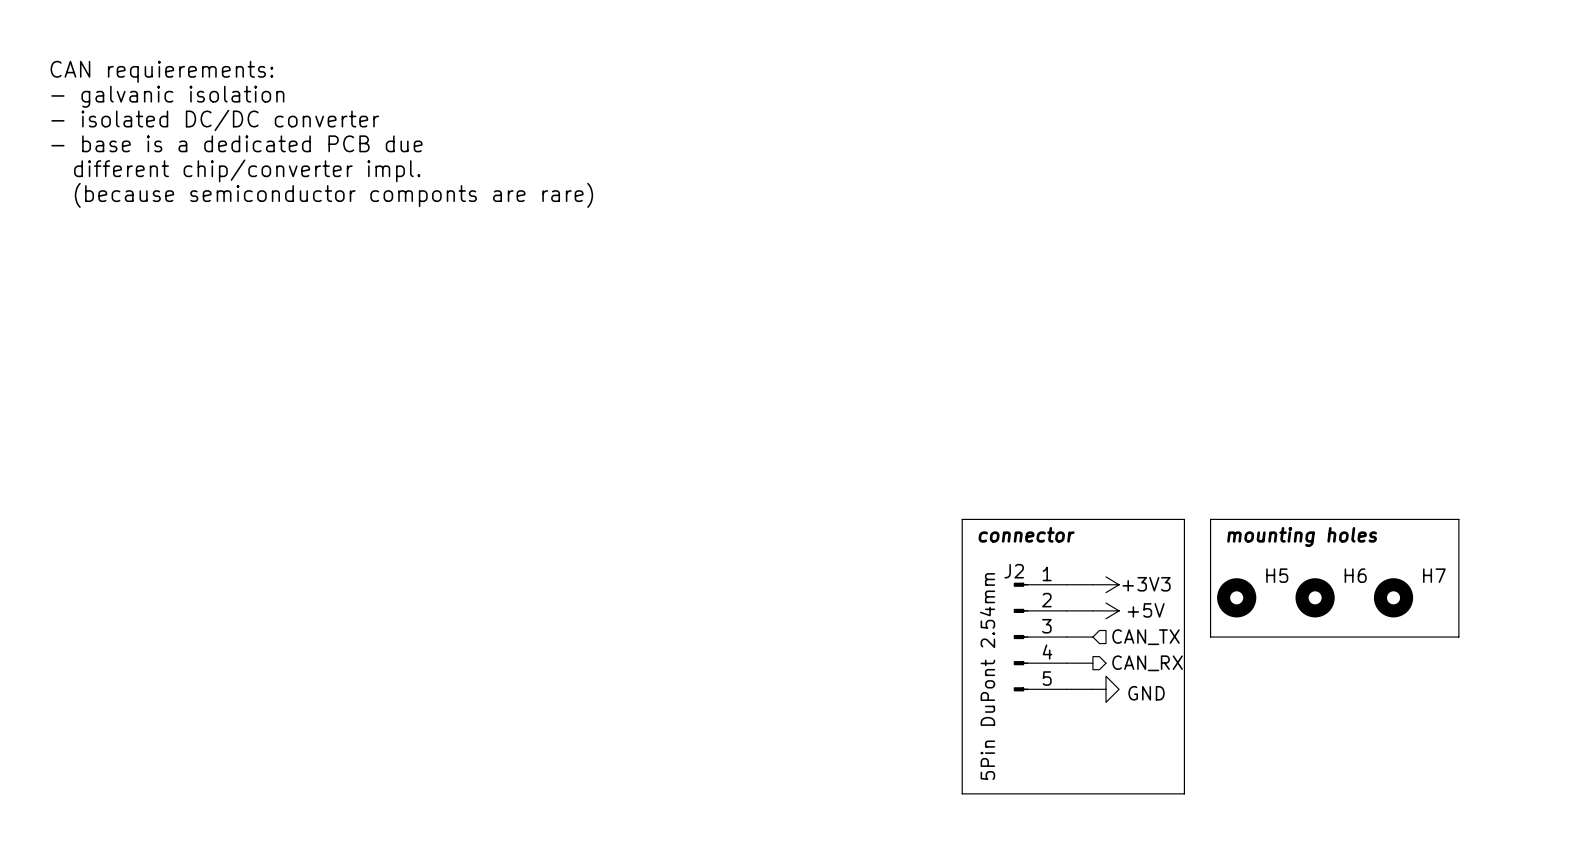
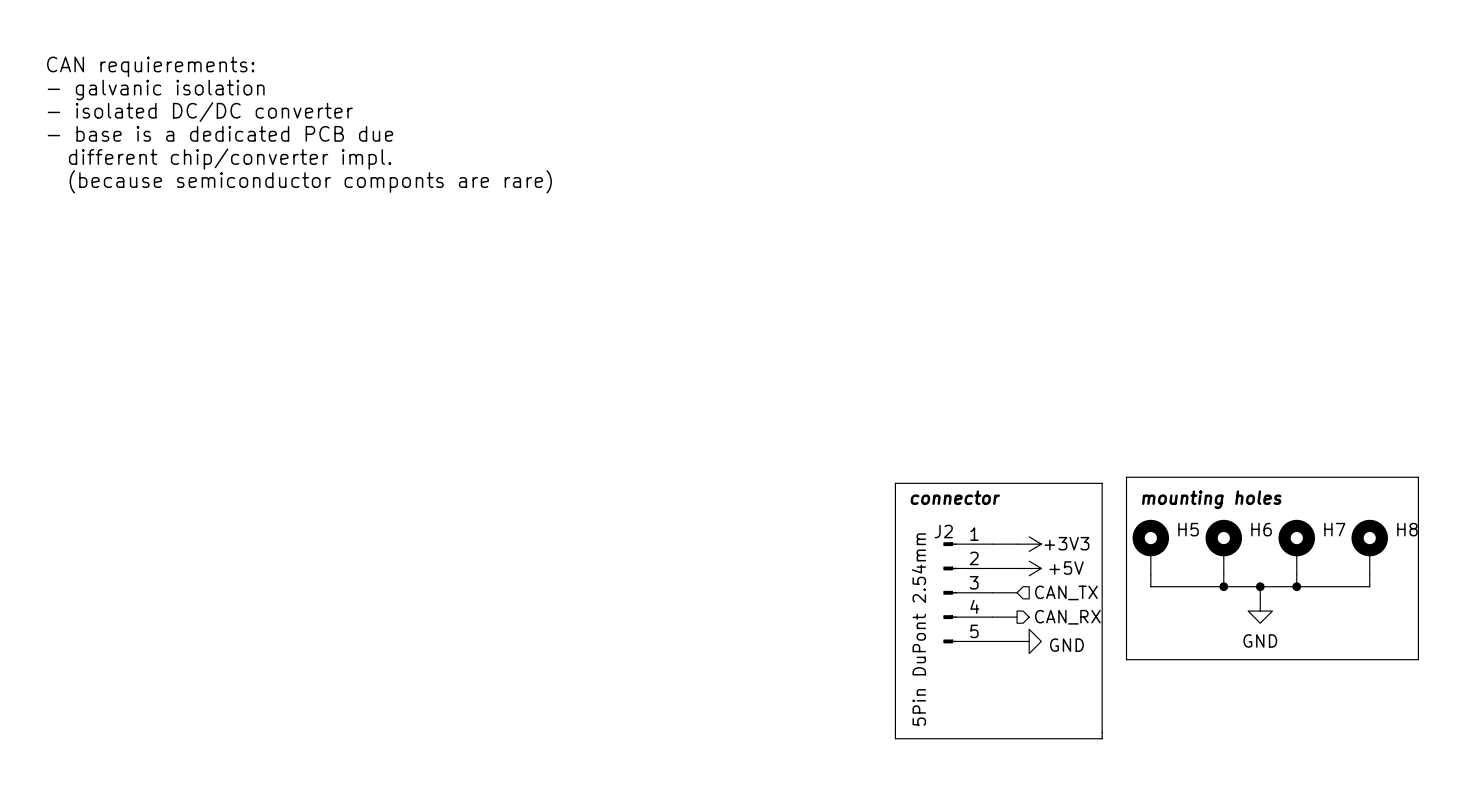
line: (1210, 519) (1458, 519) (1458, 637) (1210, 637) -> (1126, 483) (1126, 477) (1418, 477) (1418, 659) (1126, 659) (1126, 592)
H5 symbol: [1217, 578, 1257, 618] -> [1132, 519, 1170, 575]
H6 symbol: [1295, 578, 1335, 618] -> [1205, 519, 1243, 575]
H7 symbol: [1373, 578, 1414, 618] -> [1278, 519, 1316, 575]
H8: none -> (1369, 547)
wire: none -> (1150, 574) (1150, 586) (1369, 586) (1369, 574)
wire: none -> (1223, 574) (1223, 586)
wire: none -> (1296, 574) (1296, 586)
junction: none -> (1223, 586)
wire: none -> (1260, 586) (1260, 598)
junction: none -> (1260, 586)
junction: none -> (1296, 586)
power symbol: none -> GND (1260, 611)

